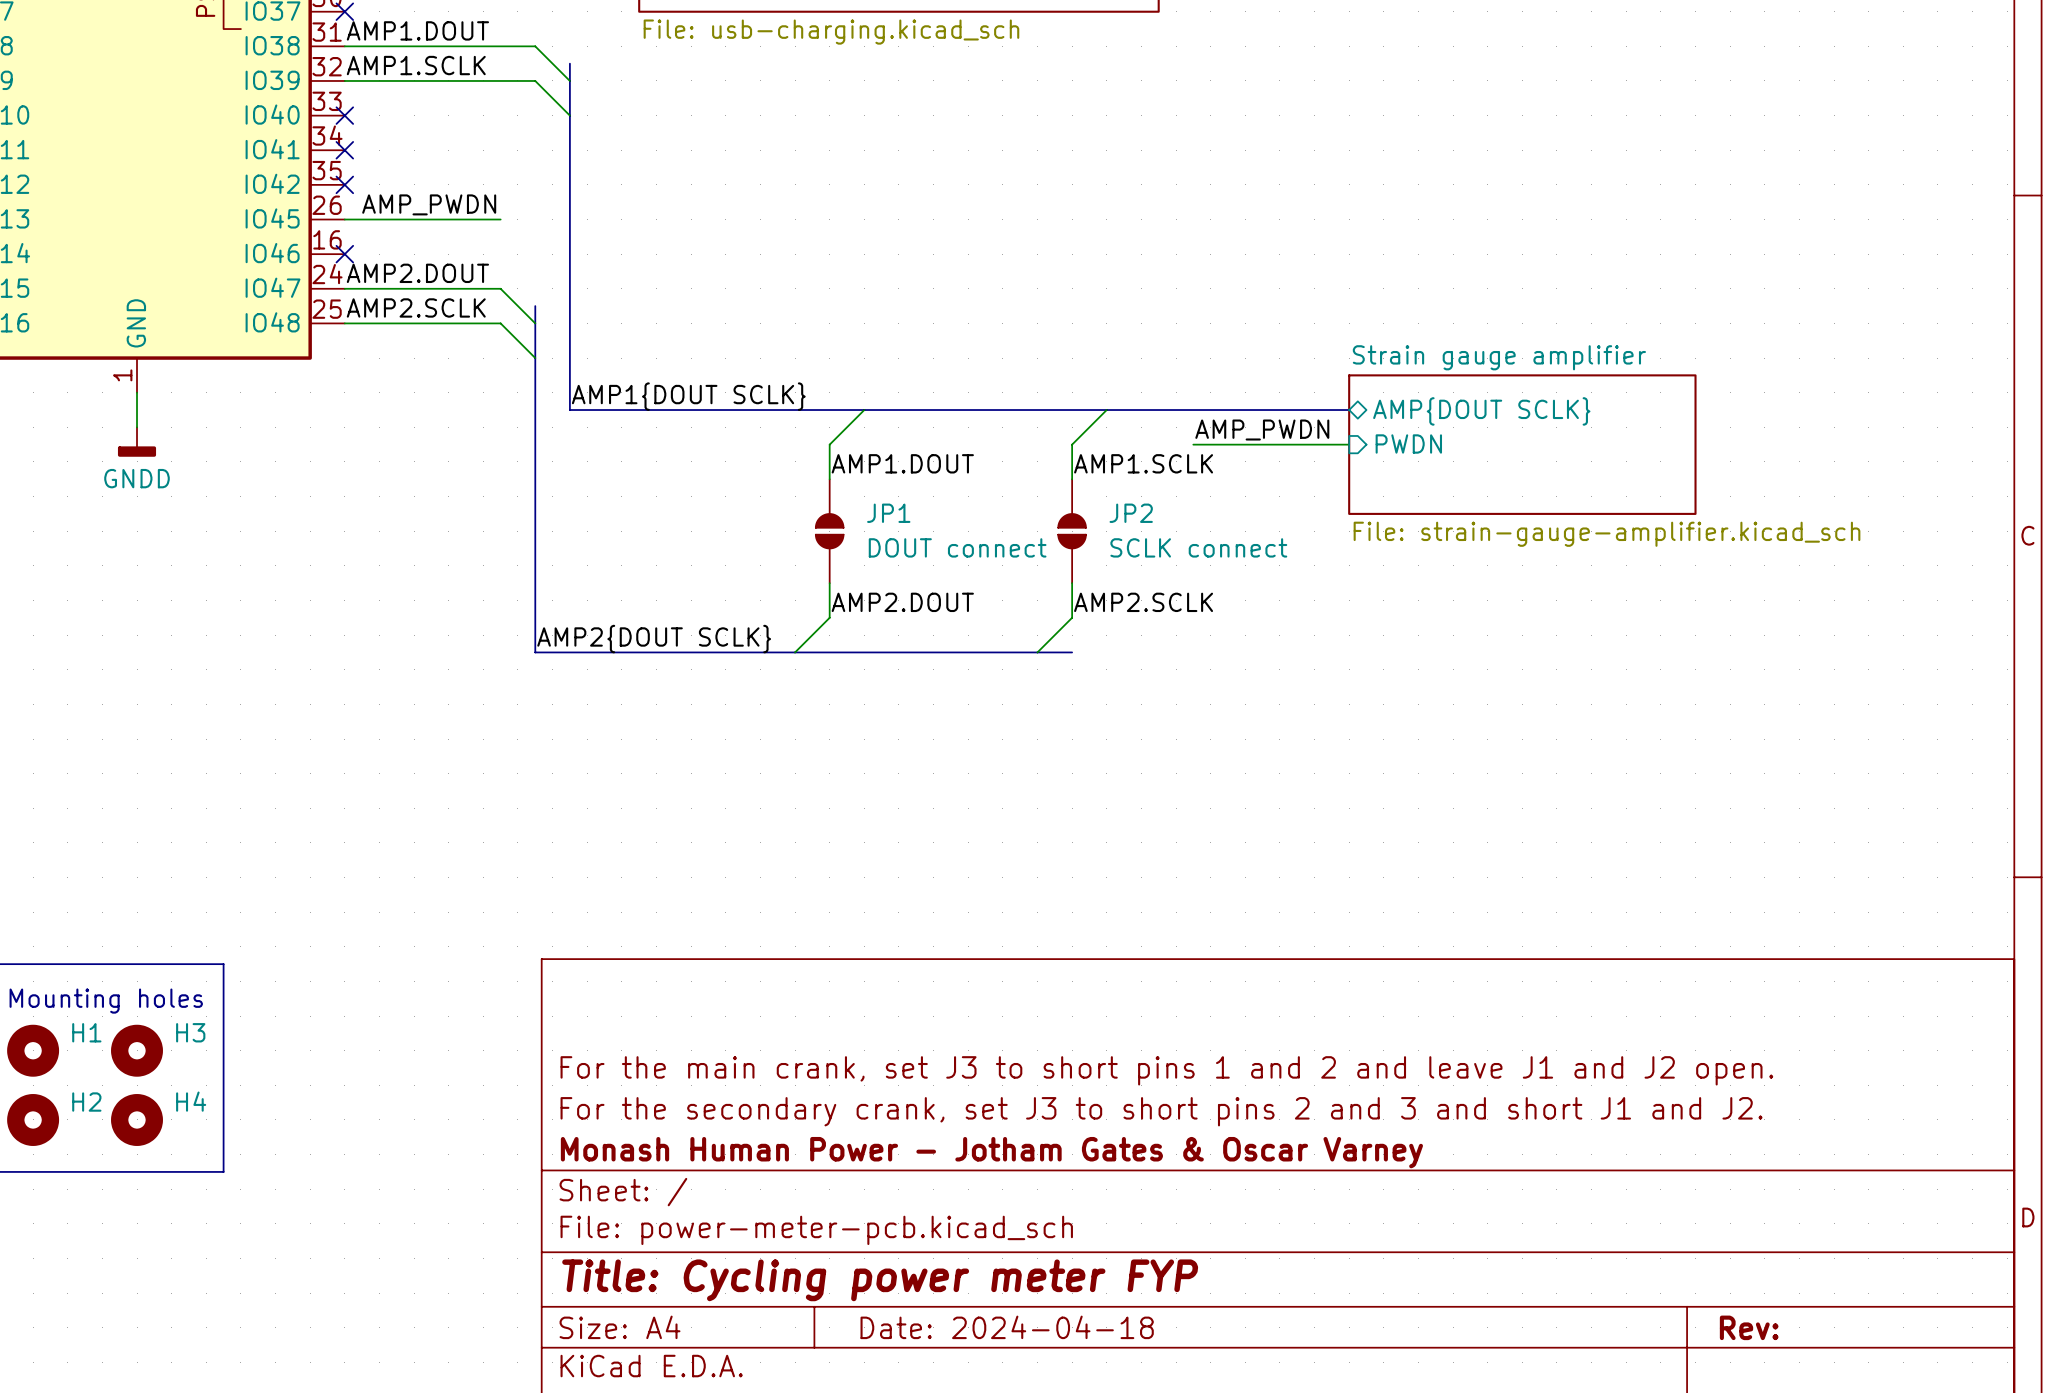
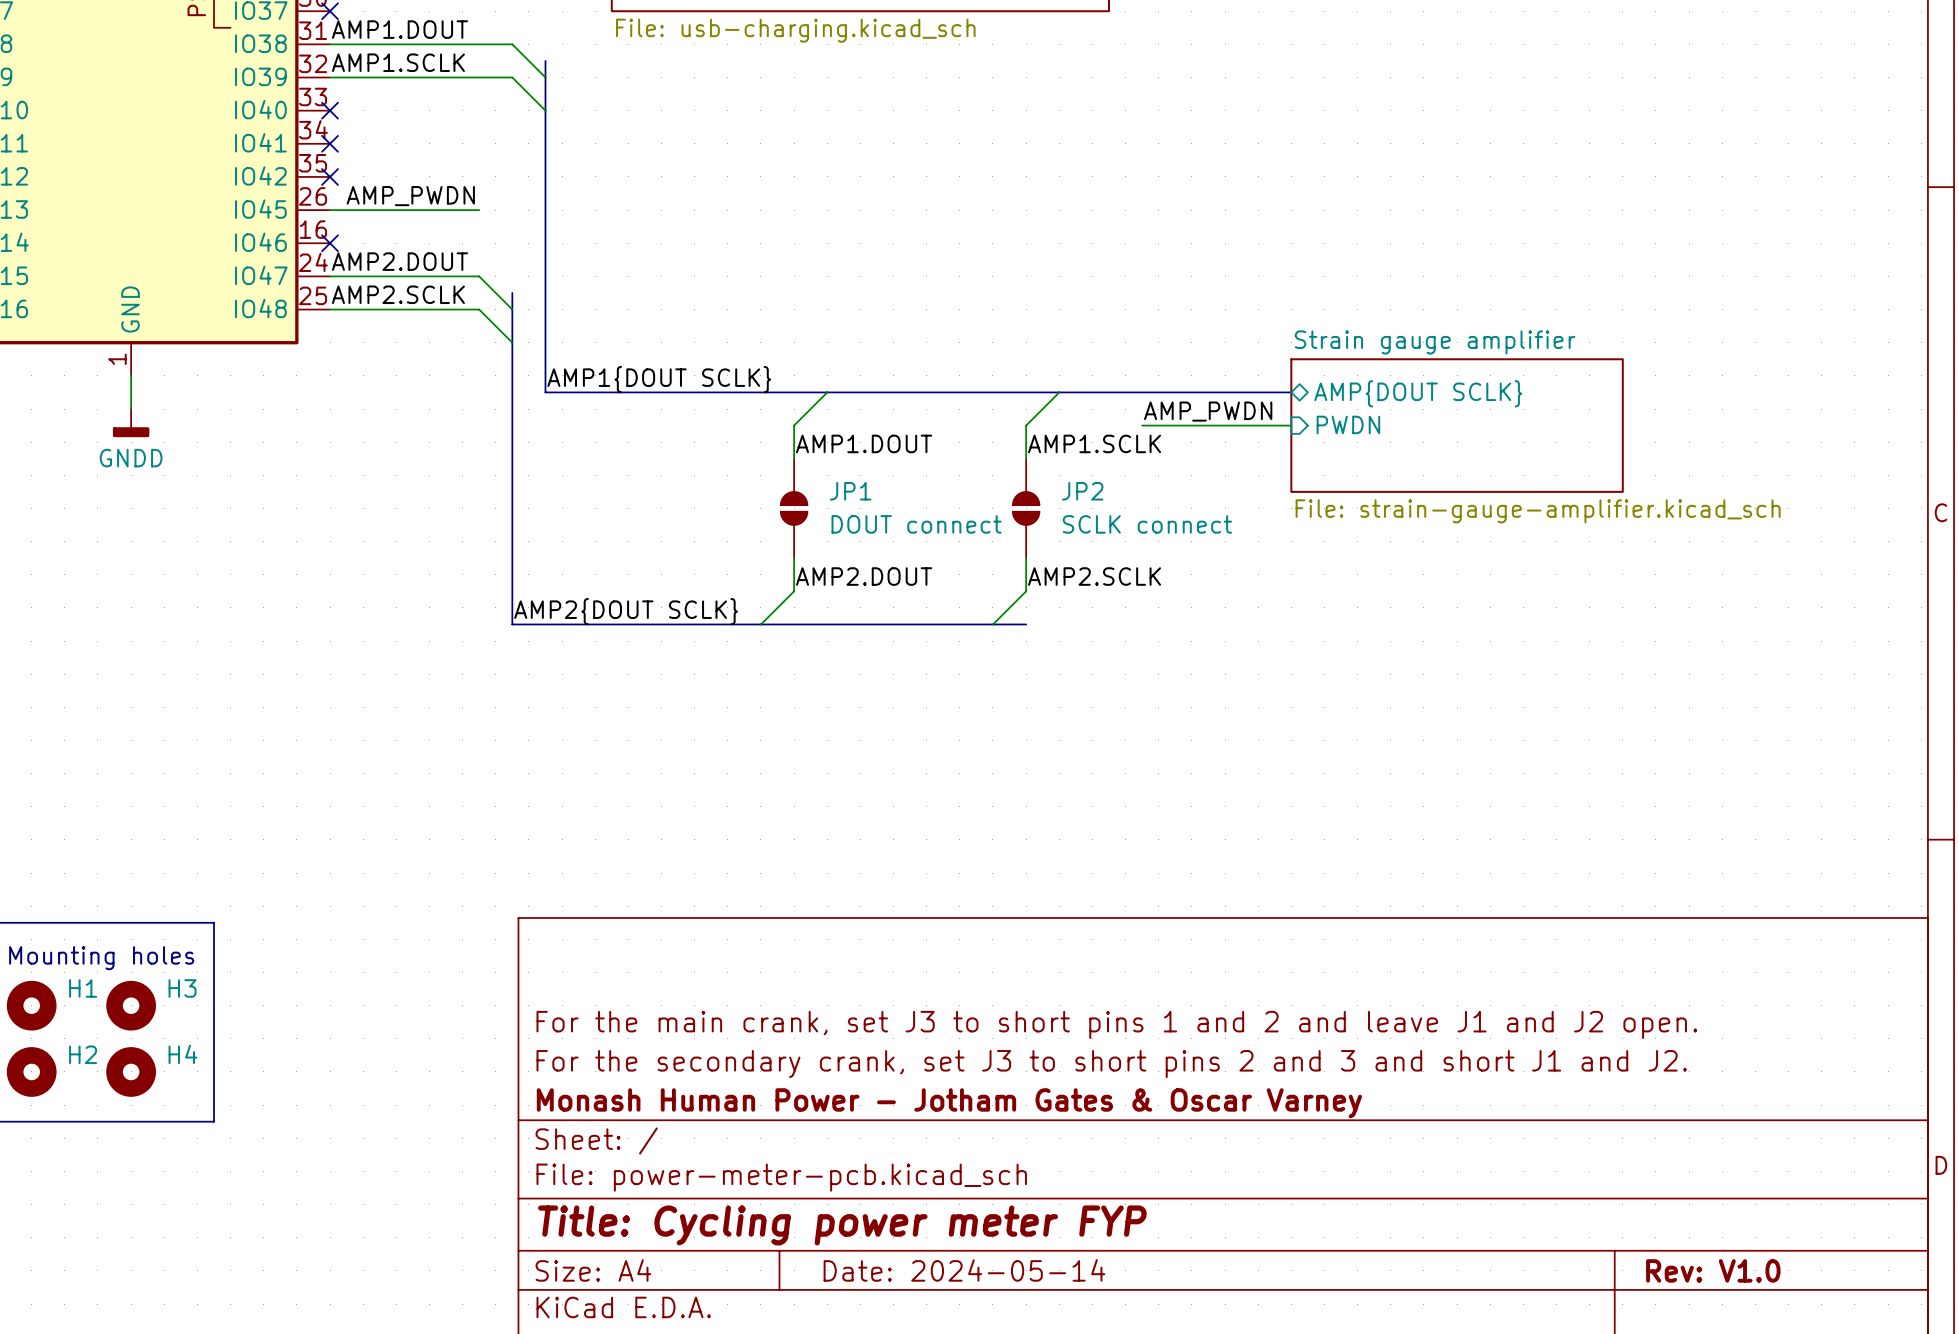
title block: Date: 2024-04-18 (1007, 1327) -> Date: 2024-05-14 (964, 1270)
title block: Rev: (1749, 1327) -> Rev: V1.0 (1713, 1270)

